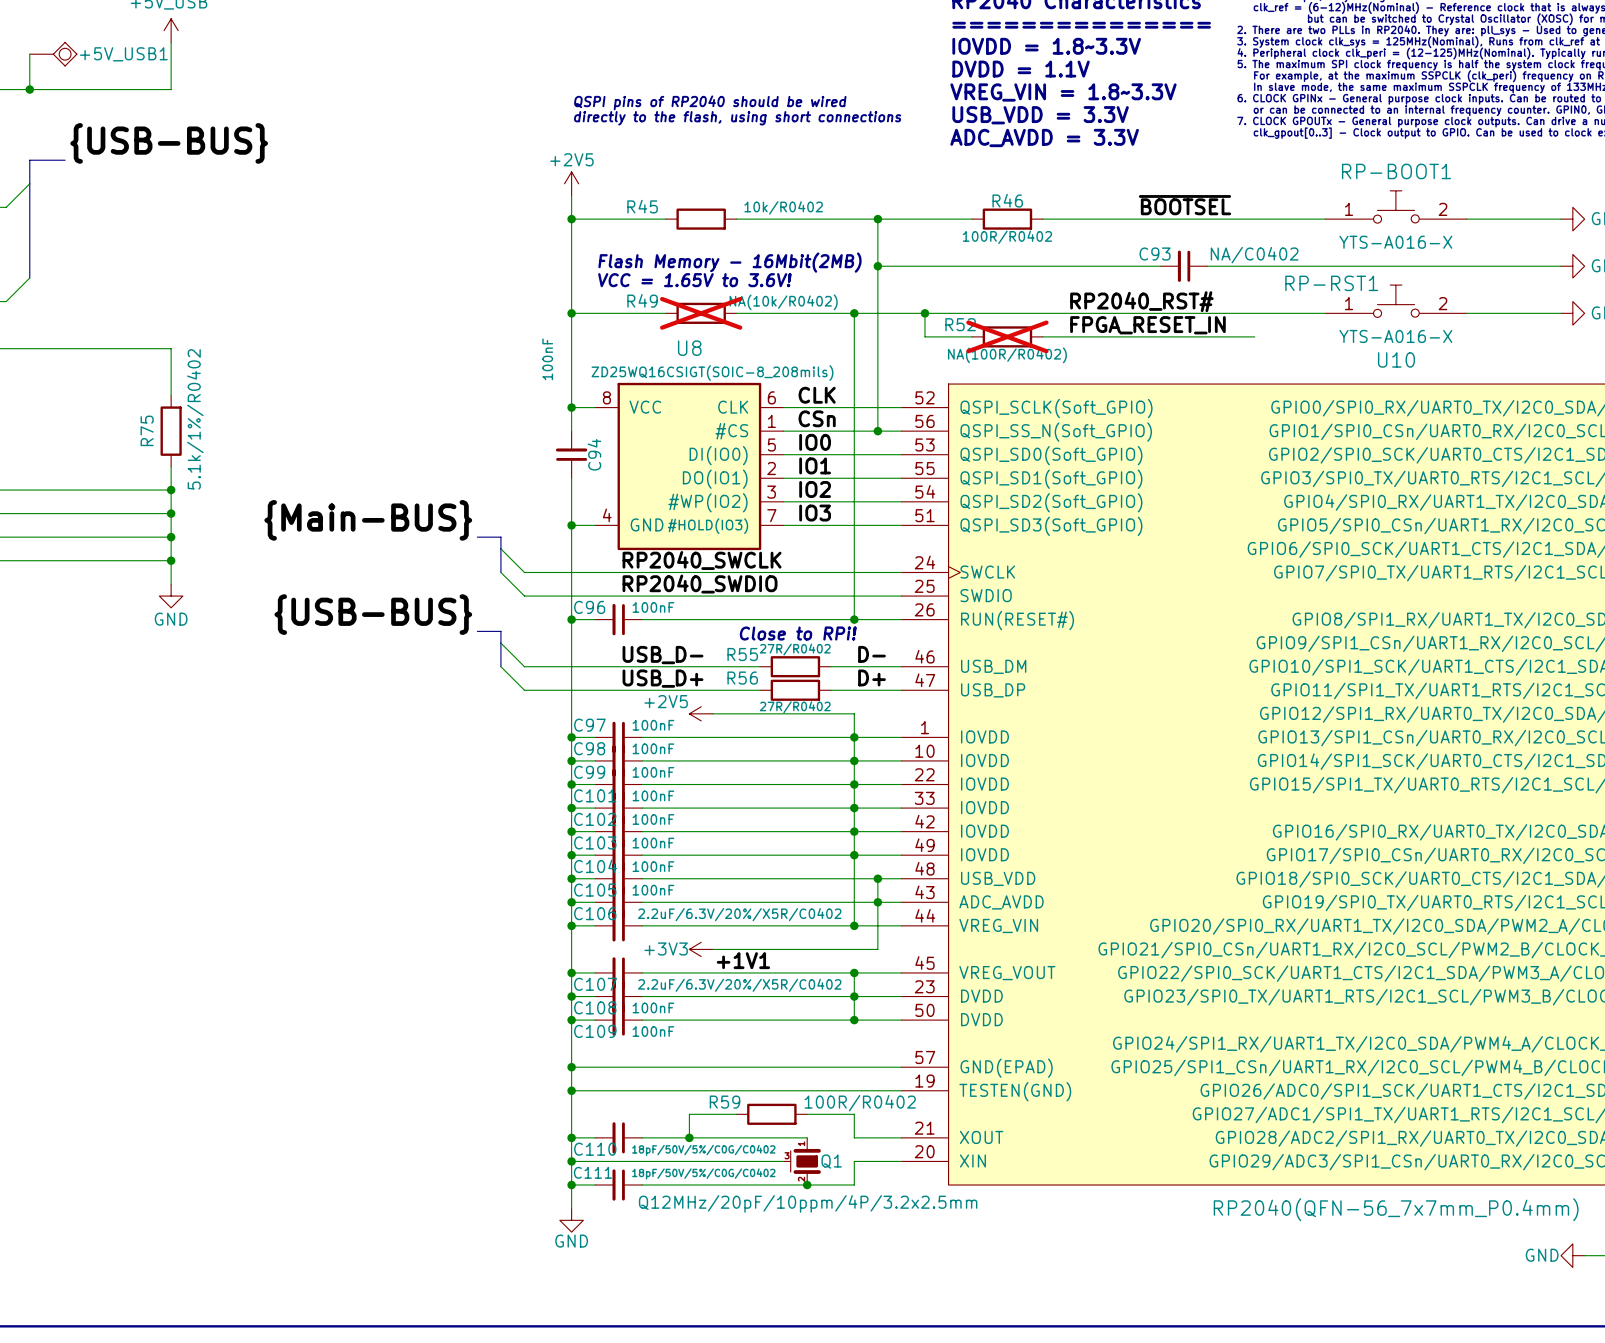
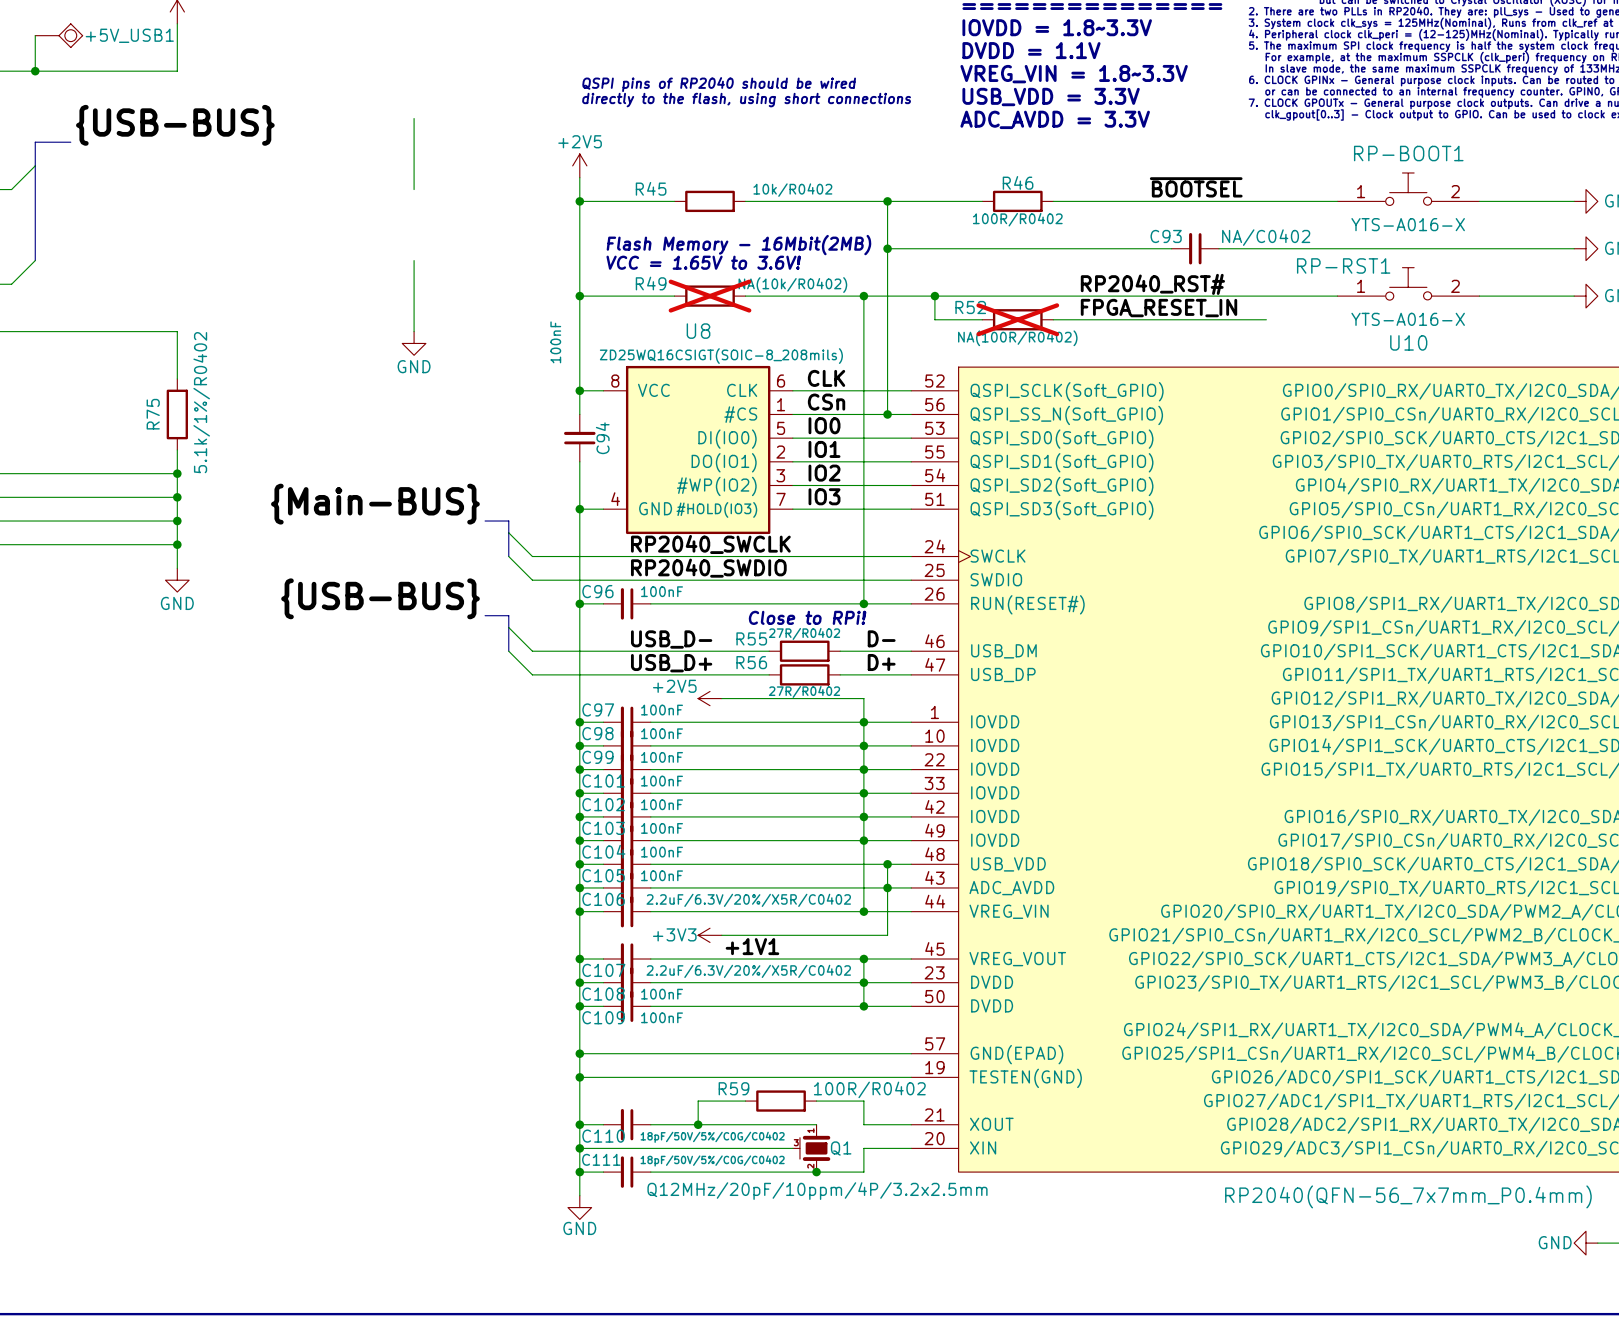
wire: none -> (414, 118) (414, 189)
wire: none -> (414, 260) (414, 331)
power symbol: none -> GND (414, 343)

